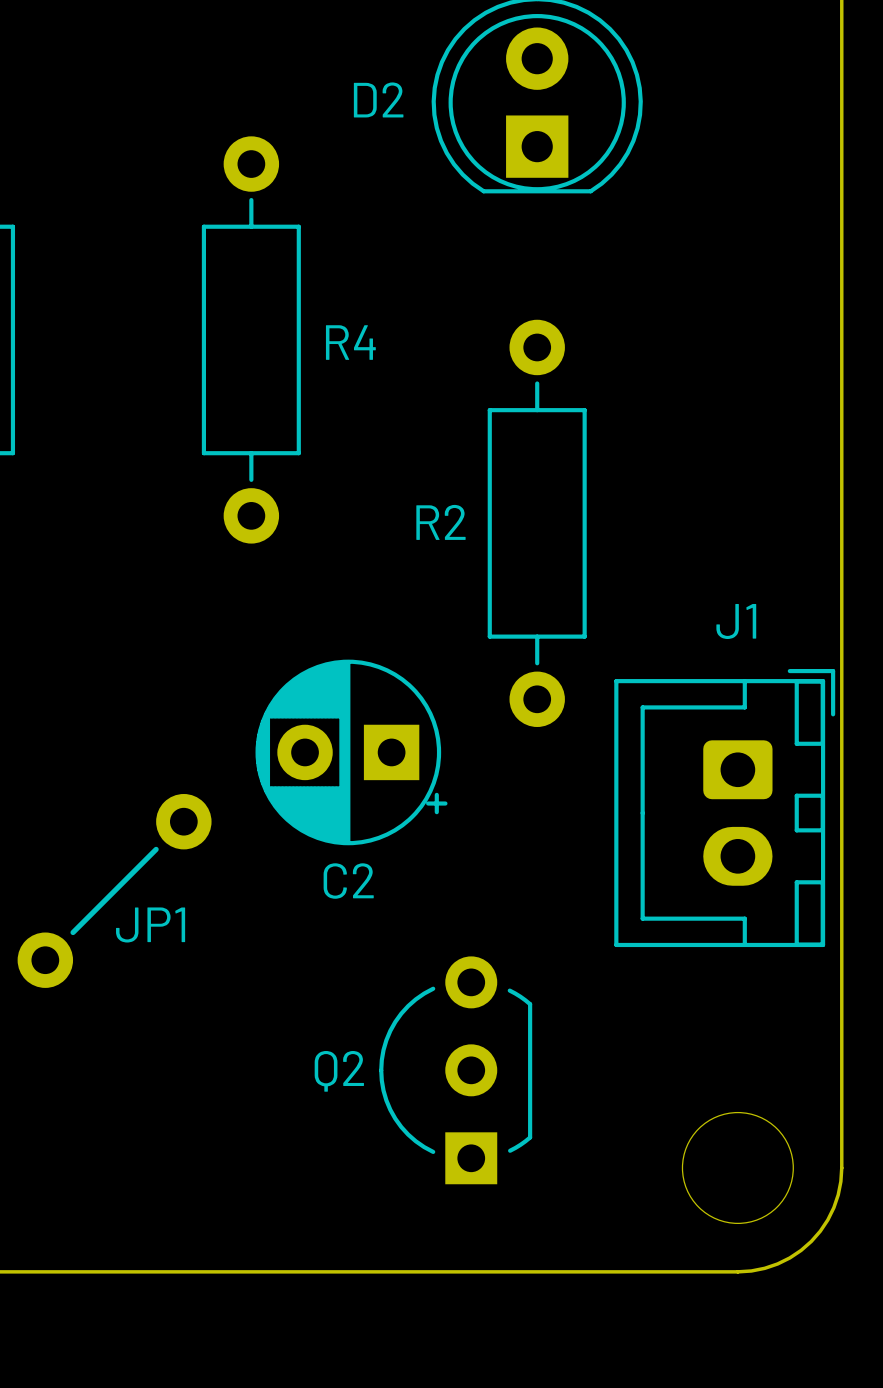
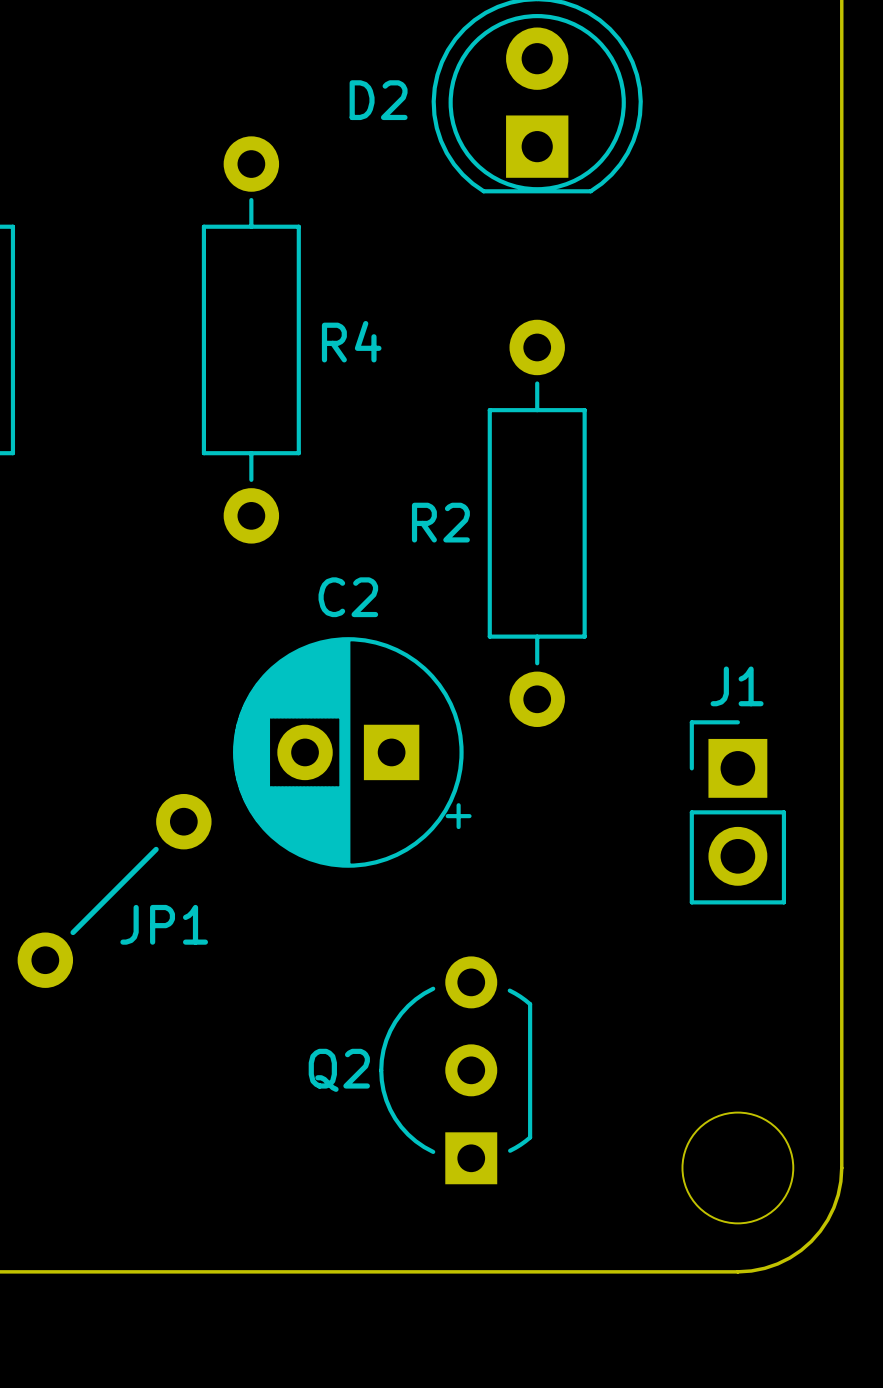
C2 footprint: [255, 659, 448, 846] -> [233, 637, 472, 868]
J1 footprint: [614, 668, 836, 948] -> [689, 720, 787, 905]
C2 name position: C2 (348, 881) -> C2 (348, 597)

